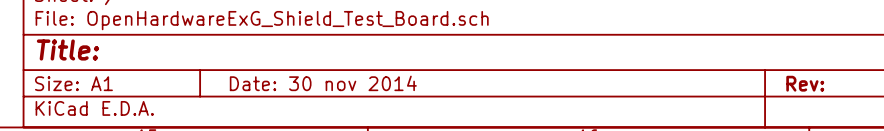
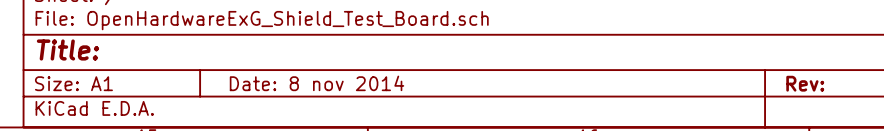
title block: Date: 30 nov 2014 (323, 83) -> Date: 8 nov 2014 (317, 83)

